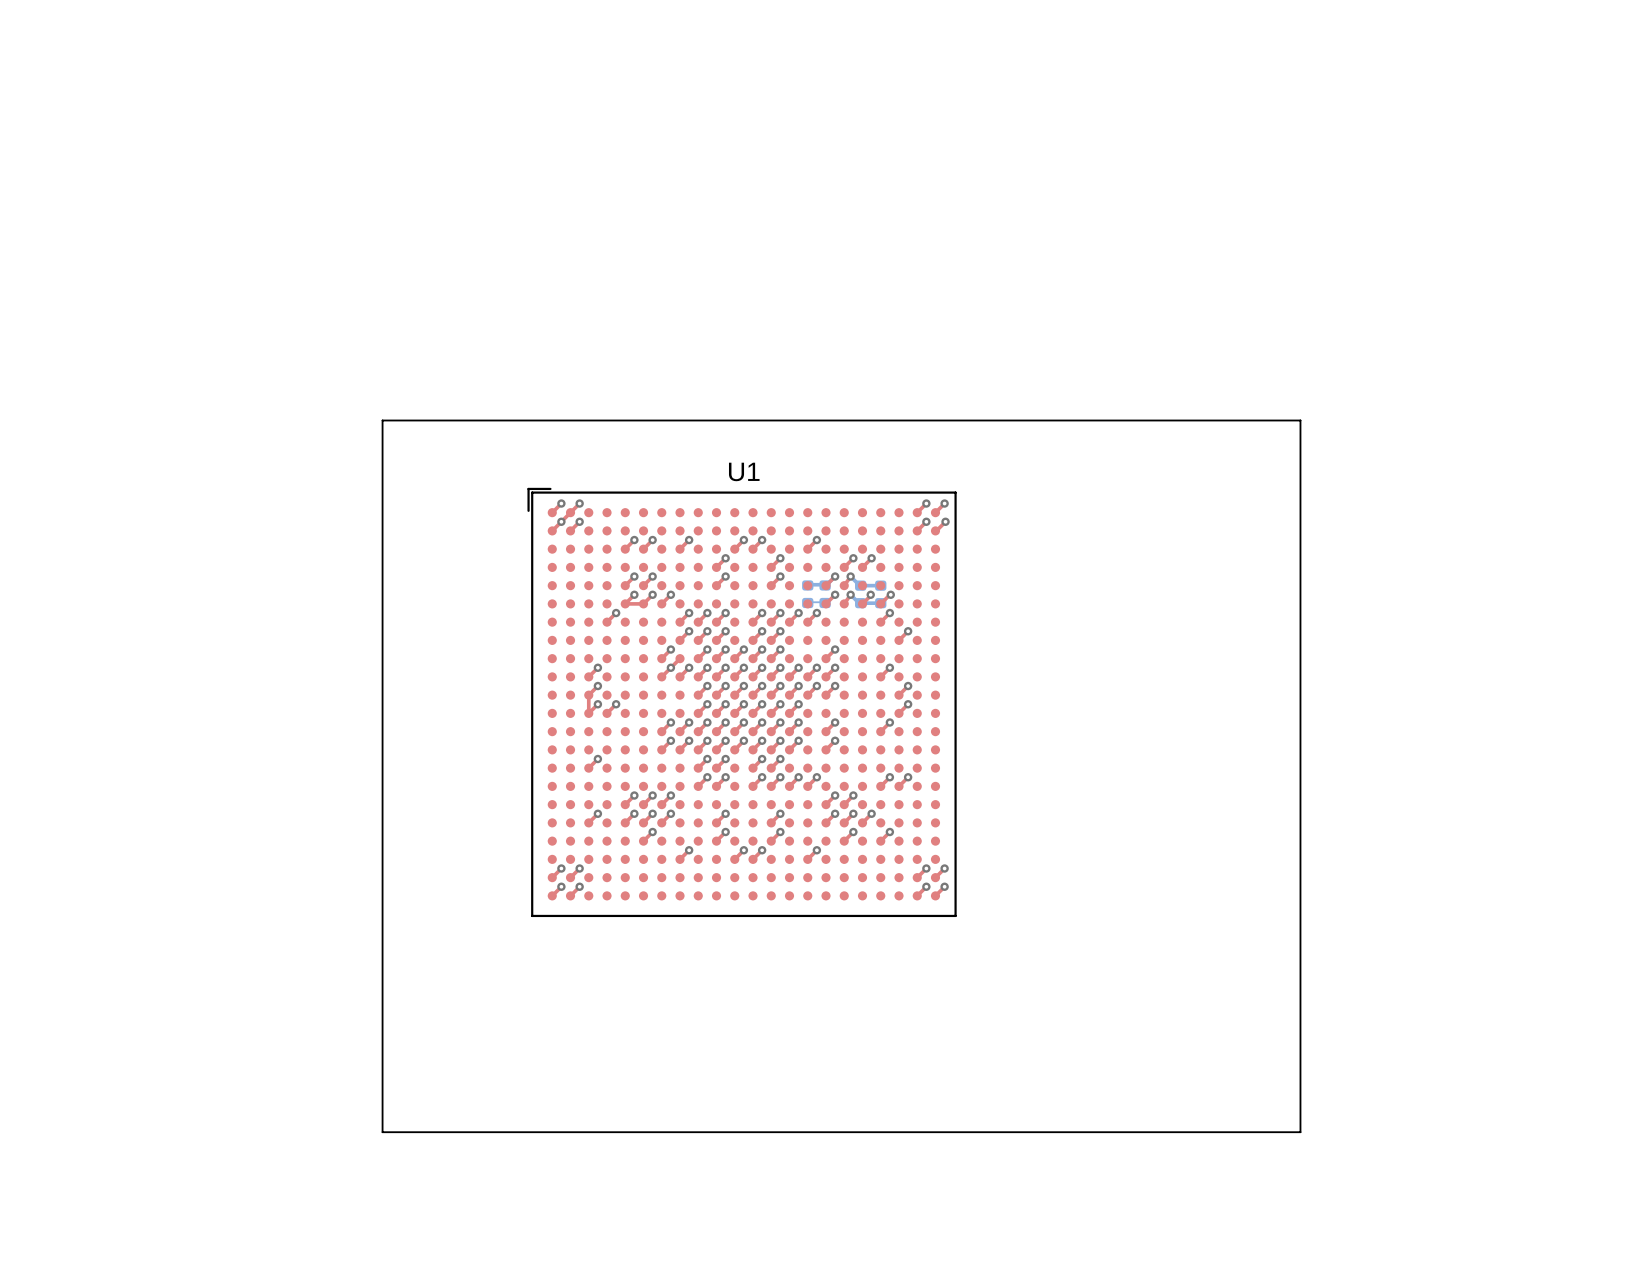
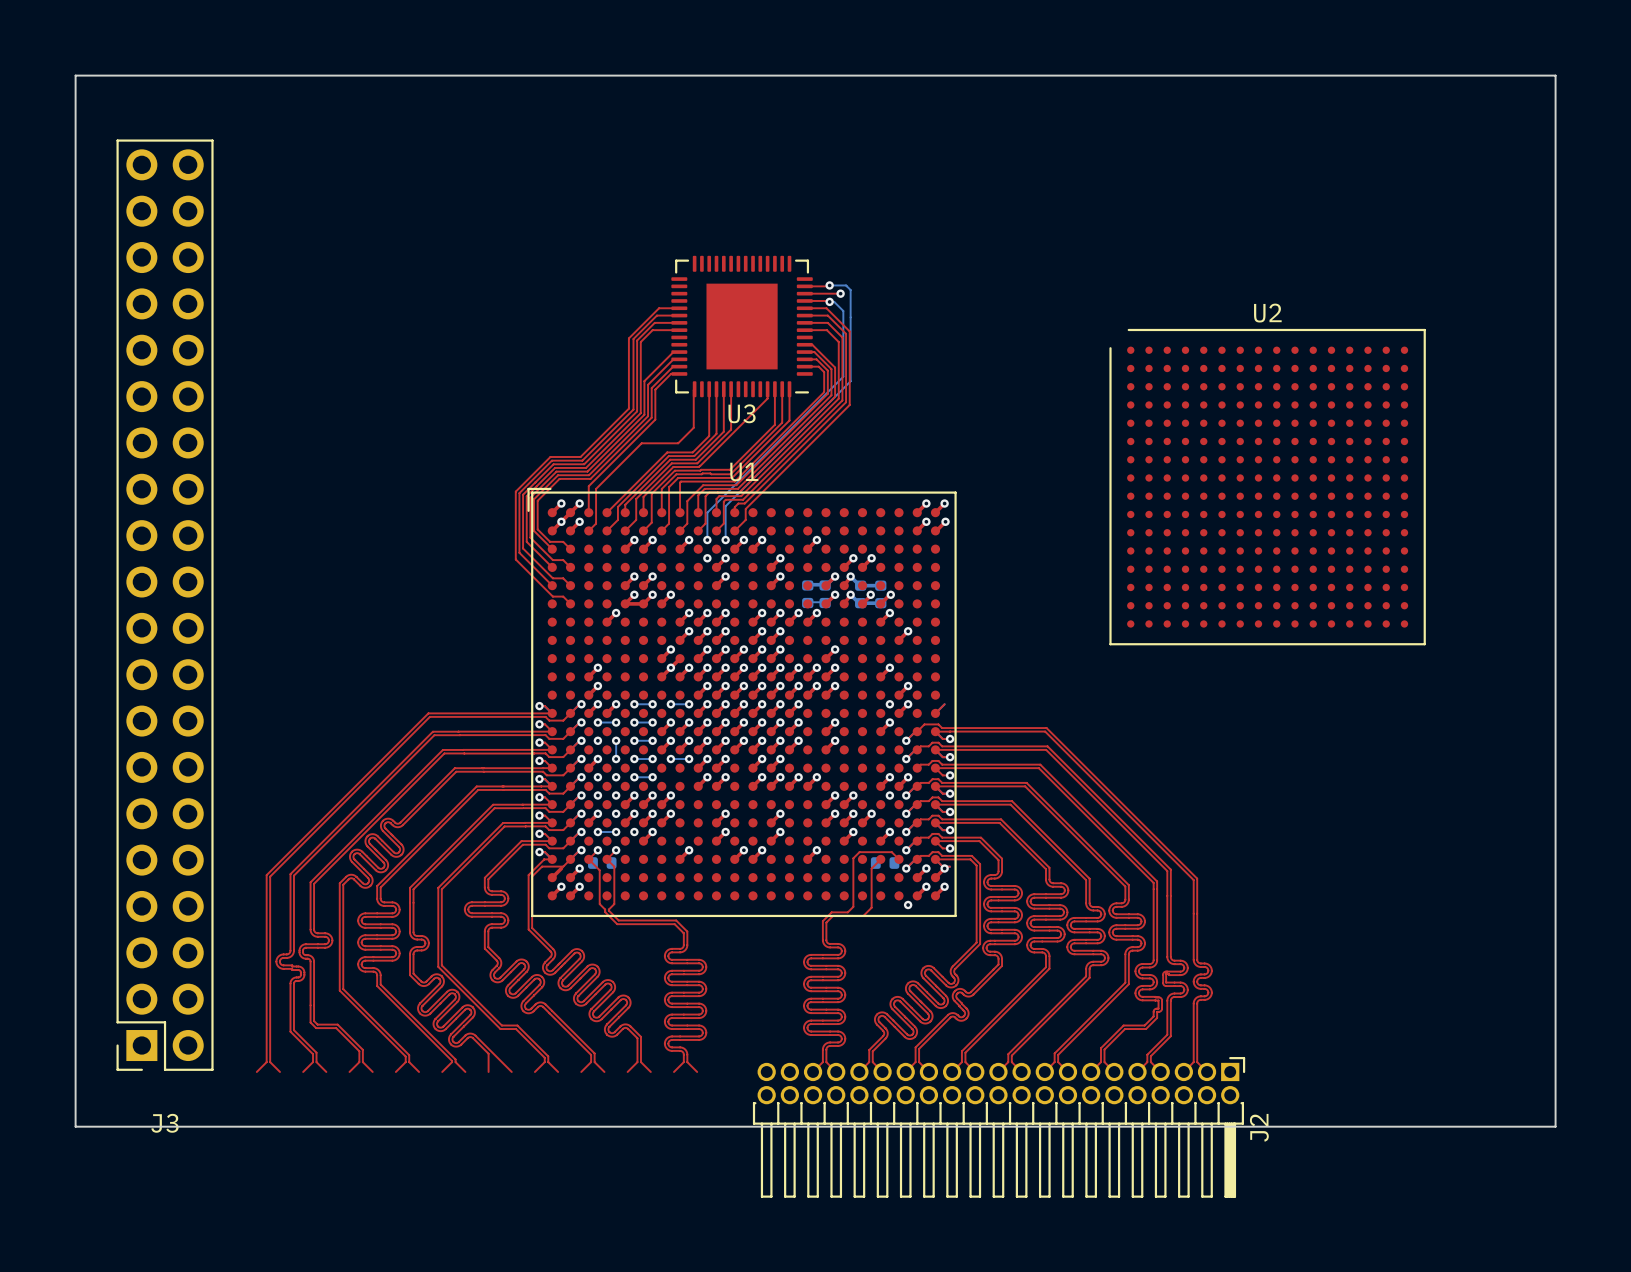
board edge: none -> (75, 75) (1555, 75) (1555, 1126) (75, 1126) (75, 75)
top track: none -> (829, 285) (804, 286)
bottom track: none -> (829, 285) (846, 285) (850, 290) (850, 381) (725, 506) (725, 540)
via: none -> (829, 285)
top track: none -> (804, 293) (840, 293)
via: none -> (840, 293)
top track: none -> (804, 300) (829, 301)
bottom track: none -> (829, 301) (834, 301) (843, 311) (843, 376) (707, 512) (707, 540)
via: none -> (829, 301)
top track: none -> (679, 308) (659, 308) (628, 338) (628, 408) (580, 456) (550, 456) (515, 491) (515, 559) (552, 596) (563, 596) (570, 603)
top track: none -> (804, 308) (826, 308) (849, 331) (849, 404) (745, 509) (745, 519) (734, 530)
top track: none -> (679, 315) (656, 315) (633, 339) (633, 409) (582, 460) (551, 460) (519, 493) (519, 552) (552, 585)
top track: none -> (804, 315) (827, 315) (846, 333) (846, 402) (744, 503) (738, 503) (734, 507) (734, 512)
top track: none -> (679, 322) (654, 322) (637, 340) (637, 411) (584, 464) (553, 464) (523, 494) (523, 548) (552, 578) (563, 578) (570, 585)
top track: none -> (804, 322) (827, 322) (842, 337) (842, 400) (743, 499) (725, 499) (723, 501) (723, 523) (716, 530)
U3: none -> (742, 326)
top track: none -> (679, 330) (652, 330) (640, 342) (640, 413) (586, 467) (555, 467) (526, 496) (526, 541) (552, 567)
top track: none -> (804, 330) (826, 330) (838, 342) (838, 398) (741, 496) (719, 496) (716, 498) (716, 512)
top track: none -> (804, 344) (812, 344) (835, 367) (835, 396) (739, 492) (709, 492) (705, 496) (705, 523) (698, 530)
top track: none -> (679, 352) (673, 352) (644, 381) (644, 414) (587, 471) (556, 471) (530, 497) (530, 537) (552, 560) (563, 560) (570, 567)
top track: none -> (804, 352) (814, 352) (831, 369) (831, 395) (737, 488) (704, 488) (698, 495) (698, 512)
top track: none -> (679, 359) (673, 359) (648, 384) (648, 416) (589, 475) (558, 475) (534, 499) (534, 530) (552, 549)
top track: none -> (804, 359) (816, 359) (827, 370) (827, 393) (736, 485) (703, 485) (687, 501) (687, 523) (680, 530)
top track: none -> (679, 366) (673, 366) (651, 388) (651, 417) (590, 478) (559, 478) (537, 500) (537, 529) (550, 541) (563, 541) (570, 549)
top track: none -> (804, 366) (818, 366) (824, 372) (824, 392) (734, 481) (680, 481) (680, 512)
top track: none -> (679, 373) (671, 373) (655, 389) (655, 419) (588, 486) (588, 512)
top track: none -> (709, 389) (709, 436) (692, 452) (667, 452) (607, 512)
top track: none -> (716, 389) (716, 433) (694, 456) (668, 456) (617, 506) (617, 519) (607, 530)
top track: none -> (723, 389) (723, 431) (695, 459) (670, 459) (625, 504) (625, 512)
top track: none -> (731, 389) (731, 429) (697, 463) (671, 463) (636, 498) (636, 519) (625, 530)
top track: none -> (767, 389) (767, 398) (700, 466) (673, 467) (643, 496) (643, 512)
top track: none -> (774, 389) (774, 424) (729, 469) (674, 470) (651, 493) (651, 522) (643, 530)
top track: none -> (782, 389) (782, 422) (730, 474) (676, 474) (661, 488) (661, 512)
top track: none -> (789, 389) (789, 420) (732, 477) (678, 477) (669, 487) (669, 523) (661, 530)
top track: none -> (694, 390) (693, 427) (678, 443) (641, 443) (596, 488) (596, 523) (588, 530)
board edge: (382, 420) (1300, 420) (1300, 1132) (382, 1132) (382, 420) -> none
U2: none -> (1267, 487)
via: none -> (707, 540)
via: none -> (725, 540)
via: none -> (707, 558)
J3: none -> (165, 605)
top track: (588, 695) (588, 713) -> none
top track: none -> (579, 704) (563, 720) (549, 720) (545, 716) (429, 716) (270, 876) (270, 1062) (280, 1071)
via: none -> (581, 704)
bottom track: none -> (634, 704) (652, 704)
via: none -> (634, 704)
via: none -> (652, 704)
bottom track: none -> (670, 704) (689, 704)
via: none -> (670, 704)
via: none -> (689, 704)
via: none -> (889, 704)
top track: none -> (944, 704) (935, 713)
top track: none -> (539, 706) (544, 706) (552, 713) (428, 713) (266, 875) (266, 1062) (256, 1071)
via: none -> (539, 706)
top track: none -> (579, 722) (563, 738) (549, 738) (545, 735) (460, 735)
via: none -> (581, 722)
bottom track: none -> (597, 722) (616, 722)
via: none -> (597, 722)
via: none -> (616, 722)
bottom track: none -> (634, 722) (652, 722)
via: none -> (634, 722)
via: none -> (652, 722)
top track: none -> (539, 724) (544, 724) (552, 731)
via: none -> (539, 724)
top track: none -> (551, 731) (432, 731) (290, 874) (290, 951) (288, 954) (279, 956) (276, 962) (281, 968) (292, 968) (300, 971) (300, 976) (293, 978) (290, 982) (290, 1031) (313, 1054) (313, 1062) (303, 1071)
top track: none -> (459, 735) (434, 735) (293, 875) (293, 951) (291, 956) (281, 958) (279, 962) (282, 965) (299, 966) (303, 969) (303, 978) (294, 983) (293, 1030) (316, 1052) (316, 1062) (326, 1071)
top track: none -> (950, 738) (942, 738) (935, 731) (1045, 731) (1193, 880) (1193, 960) (1197, 965) (1206, 967) (1208, 970) (1206, 974) (1196, 976) (1193, 982) (1197, 987) (1206, 989) (1208, 992) (1206, 995) (1197, 997) (1194, 1001) (1193, 1062) (1183, 1071)
via: none -> (950, 738)
top track: none -> (581, 740) (563, 757) (549, 757) (545, 753) (534, 753)
via: none -> (581, 740)
via: none -> (597, 740)
bottom track: none -> (616, 740) (616, 759)
via: none -> (616, 740)
bottom track: none -> (634, 740) (652, 740)
via: none -> (634, 740)
via: none -> (652, 740)
top track: none -> (906, 740) (924, 724) (938, 724) (942, 728) (1046, 728) (1197, 878) (1197, 960) (1199, 963) (1209, 965) (1211, 970) (1209, 976) (1199, 978) (1197, 981) (1199, 985) (1208, 986) (1211, 991) (1209, 998) (1199, 1000) (1197, 1003) (1197, 1062) (1207, 1071)
via: none -> (906, 740)
top track: none -> (539, 742) (544, 742) (552, 749) (442, 749) (310, 882) (310, 931) (314, 936) (326, 936) (328, 940) (325, 944) (303, 944) (299, 949) (301, 956) (310, 961) (310, 1022) (316, 1028) (336, 1028) (359, 1051) (359, 1062) (349, 1071)
via: none -> (539, 742)
top track: none -> (915, 749) (906, 759)
top track: none -> (917, 749) (920, 746) (928, 746) (932, 742) (938, 742) (942, 746) (1047, 746) (1170, 869) (1170, 957) (1173, 960) (1184, 961) (1187, 967) (1186, 972) (1182, 974) (1166, 974) (1166, 982) (1182, 982) (1187, 989) (1183, 996) (1171, 998) (1170, 1036) (1150, 1056) (1150, 1062) (1160, 1071)
top track: none -> (534, 753) (444, 753) (314, 883) (314, 930) (316, 933) (328, 934) (332, 940) (327, 947) (305, 947) (303, 949) (303, 954) (311, 956) (314, 960) (314, 1021) (317, 1024) (337, 1024) (362, 1049) (362, 1062) (372, 1071)
top track: none -> (950, 757) (942, 757) (935, 749) (1046, 749) (1167, 871) (1167, 958) (1170, 963) (1181, 964) (1184, 967) (1181, 971) (1164, 972) (1163, 983) (1165, 986) (1181, 986) (1184, 990) (1181, 993) (1172, 993) (1168, 996) (1167, 1034) (1147, 1054) (1147, 1062) (1137, 1071)
via: none -> (950, 757)
top track: none -> (579, 759) (563, 775) (546, 775) (543, 771) (456, 771) (402, 825) (395, 826) (388, 822) (384, 823) (385, 828) (402, 846) (403, 851) (400, 855) (392, 855) (374, 838) (369, 839) (369, 843) (387, 862) (385, 870) (377, 871) (359, 853) (353, 855) (354, 859) (371, 876) (372, 881) (369, 886) (364, 887) (350, 878) (343, 884) (343, 989) (409, 1055) (409, 1062) (419, 1071)
via: none -> (581, 759)
via: none -> (616, 759)
bottom track: none -> (634, 759) (652, 759)
via: none -> (634, 759)
via: none -> (652, 759)
bottom track: none -> (670, 759) (689, 759)
via: none -> (670, 759)
via: none -> (689, 759)
via: none -> (906, 759)
top track: none -> (539, 760) (544, 760) (552, 768) (454, 768) (400, 822) (396, 823) (388, 818) (381, 822) (381, 829) (399, 847) (398, 852) (394, 852) (375, 834) (366, 836) (366, 844) (383, 862) (383, 868) (378, 868) (359, 850) (354, 850) (350, 854) (351, 861) (369, 881) (364, 884) (355, 876) (350, 874) (339, 883) (339, 990) (405, 1056) (405, 1062) (395, 1071)
via: none -> (539, 760)
top track: none -> (917, 768) (920, 764) (928, 764) (932, 760) (938, 760) (942, 764) (1040, 764) (1157, 881) (1156, 961) (1153, 966) (1141, 967) (1138, 971) (1141, 974) (1153, 976) (1157, 982) (1153, 988) (1141, 989) (1138, 993) (1141, 996) (1160, 997) (1161, 1009) (1157, 1011) (1157, 1017) (1146, 1029) (1125, 1029) (1104, 1049) (1104, 1062) (1114, 1071)
top track: none -> (950, 775) (942, 775) (935, 768) (1038, 768) (1153, 882) (1153, 961) (1150, 963) (1139, 964) (1135, 971) (1138, 977) (1151, 978) (1153, 982) (1150, 985) (1138, 987) (1135, 993) (1140, 999) (1155, 1000)
via: none -> (950, 775)
top track: none -> (579, 777) (563, 793) (549, 793) (545, 789) (478, 789) (380, 887) (381, 900) (396, 903) (399, 908) (397, 914) (393, 916) (364, 916) (361, 919) (364, 924) (394, 924) (399, 931) (398, 936) (394, 938) (362, 939) (361, 942) (363, 945) (394, 946) (398, 948) (399, 953) (398, 957) (394, 960) (363, 960) (362, 966) (378, 970) (380, 984) (455, 1059) (455, 1062) (465, 1071)
via: none -> (581, 777)
via: none -> (597, 777)
via: none -> (616, 777)
bottom track: none -> (634, 777) (652, 777)
via: none -> (634, 777)
via: none -> (652, 777)
top track: none -> (539, 779) (544, 779) (552, 786) (476, 786) (377, 886) (378, 902) (382, 905) (394, 906) (395, 912) (364, 913) (358, 918) (358, 923) (363, 927) (392, 927) (395, 929) (393, 935) (364, 935) (360, 937) (358, 944) (362, 949) (392, 949) (396, 953) (392, 957) (363, 957) (358, 961) (358, 966) (363, 971) (376, 972) (377, 986) (452, 1060) (442, 1071)
via: none -> (539, 779)
top track: none -> (915, 786) (906, 795)
top track: none -> (917, 786) (920, 782) (928, 782) (932, 779) (938, 779) (942, 782) (1026, 782) (1128, 885) (1127, 903) (1124, 906) (1114, 907) (1113, 911) (1116, 914) (1140, 914) (1144, 918) (1144, 923) (1139, 928) (1115, 928) (1112, 933) (1116, 936) (1140, 936) (1144, 940) (1144, 945) (1140, 949) (1129, 952) (1128, 984) (1058, 1054) (1058, 1062) (1067, 1071)
top track: none -> (950, 793) (942, 793) (935, 786) (1025, 786) (1125, 886) (1124, 901) (1111, 905) (1109, 909) (1110, 915) (1115, 917) (1138, 917) (1141, 920) (1138, 925) (1115, 925) (1110, 928) (1109, 934) (1113, 938) (1138, 939) (1141, 942) (1139, 946) (1130, 947) (1125, 951) (1125, 982) (1054, 1053) (1054, 1062) (1044, 1071)
via: none -> (950, 793)
top track: none -> (579, 795) (563, 811) (549, 811) (545, 808) (523, 808)
via: none -> (581, 795)
via: none -> (597, 795)
via: none -> (616, 795)
via: none -> (889, 795)
via: none -> (906, 795)
top track: none -> (539, 797) (544, 797) (552, 804)
via: none -> (539, 797)
top track: none -> (551, 804) (493, 804) (410, 887) (410, 933) (413, 938) (423, 939) (425, 943) (423, 946) (414, 947) (410, 951) (410, 975) (422, 985) (427, 985) (435, 977) (440, 980) (419, 1004) (418, 1011) (422, 1015) (427, 1015) (449, 993) (454, 993) (455, 998) (434, 1019) (434, 1026) (437, 1030) (443, 1030) (465, 1009) (469, 1009) (470, 1014) (450, 1035) (449, 1041) (451, 1045) (457, 1046) (468, 1037) (472, 1037) (488, 1053) (488, 1071)
top track: none -> (915, 804) (906, 813)
top track: none -> (917, 804) (920, 801) (928, 801) (932, 797) (938, 797) (942, 801) (1012, 801) (1089, 878) (1089, 904) (1100, 907) (1104, 911) (1104, 917) (1099, 921) (1074, 921) (1070, 925) (1074, 928) (1100, 929) (1104, 934) (1102, 941) (1098, 943) (1074, 943) (1070, 947) (1074, 950) (1103, 951) (1107, 954) (1107, 961) (1103, 964) (1090, 966) (1089, 977) (1011, 1055) (1011, 1062) (1021, 1071)
top track: none -> (523, 808) (494, 808) (413, 889) (413, 933) (416, 935) (425, 937) (428, 943) (425, 949) (414, 952) (413, 973) (422, 982) (435, 974) (441, 975) (443, 980) (442, 985) (422, 1006) (422, 1010) (427, 1011) (448, 990) (456, 991) (459, 996) (458, 1000) (437, 1021) (437, 1026) (443, 1026) (464, 1006) (471, 1006) (474, 1010) (473, 1016) (453, 1037) (452, 1041) (457, 1042) (466, 1034) (473, 1034) (511, 1071)
top track: none -> (950, 811) (942, 811) (935, 804) (1010, 804) (1086, 880) (1086, 906) (1090, 910) (1099, 910) (1101, 913) (1098, 917) (1073, 917) (1069, 920) (1067, 926) (1071, 931) (1098, 932) (1101, 936) (1098, 939) (1072, 940) (1068, 943) (1067, 947) (1072, 954) (1102, 954) (1104, 959) (1088, 963) (1086, 976) (1008, 1054) (1008, 1062) (998, 1071)
via: none -> (950, 811)
top track: none -> (579, 813) (563, 830) (549, 830) (545, 826) (525, 826)
via: none -> (581, 813)
via: none -> (616, 813)
via: none -> (906, 813)
top track: none -> (539, 815) (544, 815) (552, 822)
via: none -> (539, 815)
top track: none -> (551, 822) (503, 822) (438, 887) (438, 966) (500, 1029) (515, 1029) (544, 1057) (544, 1062) (534, 1071)
top track: none -> (915, 822) (906, 832)
top track: none -> (917, 822) (920, 819) (928, 819) (932, 815) (938, 815) (942, 819) (1001, 819) (1049, 867) (1050, 882) (1063, 883) (1068, 888) (1067, 894) (1063, 897) (1033, 897) (1031, 899) (1033, 905) (1060, 905) (1065, 907) (1067, 913) (1063, 918) (1033, 919) (1030, 923) (1033, 927) (1059, 927) (1063, 931) (1064, 936) (1059, 941) (1033, 941) (1031, 943) (1032, 948) (1043, 949) (1047, 951) (1049, 968) (965, 1052) (965, 1062) (975, 1071)
top track: none -> (525, 826) (504, 826) (441, 889) (441, 965) (501, 1025) (517, 1025) (548, 1056) (548, 1062) (558, 1071)
top track: none -> (950, 830) (942, 830) (935, 822) (999, 822) (1045, 869) (1048, 884) (1062, 887) (1064, 890) (1061, 894) (1033, 894) (1028, 897) (1027, 903) (1031, 907) (1060, 908) (1063, 912) (1060, 916) (1031, 916) (1027, 921) (1028, 927) (1033, 930) (1058, 930) (1060, 935) (1057, 937) (1033, 938) (1028, 940) (1027, 946) (1029, 950) (1045, 954) (1045, 967) (961, 1051) (961, 1062) (952, 1071)
via: none -> (950, 830)
top track: none -> (579, 832) (563, 848) (549, 848) (545, 844) (522, 844) (488, 879) (489, 889) (505, 892) (508, 897) (506, 903) (501, 905) (471, 905) (468, 909) (471, 913) (501, 913) (506, 915) (508, 921) (505, 926) (491, 927) (488, 930) (488, 947) (501, 962) (500, 966) (494, 973) (494, 977) (499, 978) (517, 960) (525, 960) (528, 964) (527, 970) (510, 988) (509, 992) (515, 993) (533, 975) (541, 976) (544, 980) (543, 985) (525, 1003) (525, 1008) (530, 1009) (538, 1002) (544, 1003) (594, 1053) (594, 1062) (604, 1071)
via: none -> (581, 832)
bottom track: none -> (597, 832) (616, 832)
via: none -> (597, 832)
via: none -> (616, 832)
via: none -> (634, 832)
via: none -> (906, 832)
top track: none -> (539, 833) (544, 833) (552, 841) (521, 841) (484, 877) (486, 892) (490, 894) (502, 895) (503, 901) (470, 902) (465, 905) (465, 911) (470, 916) (504, 918) (502, 923) (489, 924) (485, 929) (484, 948) (497, 962) (490, 972) (491, 978) (494, 981) (500, 981) (519, 963) (523, 963) (524, 968) (506, 988) (507, 995) (513, 997) (517, 996) (535, 979) (539, 979) (540, 984) (522, 1002) (521, 1008) (529, 1013) (538, 1006) (542, 1006) (591, 1054) (591, 1062) (581, 1071)
via: none -> (539, 833)
top track: none -> (915, 841) (906, 850)
top track: none -> (917, 841) (920, 837) (928, 837) (932, 833) (938, 833) (942, 837) (981, 837) (1002, 858) (1001, 874) (997, 878) (988, 879) (988, 884) (1016, 886) (1021, 891) (1020, 897) (1017, 900) (990, 900) (988, 902) (990, 907) (1015, 907) (1019, 910) (1021, 916) (1017, 921) (990, 922) (987, 926) (990, 929) (1017, 930) (1020, 933) (1021, 938) (1016, 944) (987, 945) (988, 950) (997, 952) (1000, 955) (1002, 965) (972, 995) (967, 996) (960, 992) (957, 993) (956, 997) (962, 1003)
top track: none -> (950, 848) (942, 848) (935, 841) (979, 841) (998, 860) (998, 872) (986, 877) (984, 881) (985, 886) (990, 889) (1015, 889) (1018, 893) (1015, 896) (990, 896) (984, 901) (984, 906) (988, 910) (1015, 911) (1018, 915) (1015, 918) (988, 919) (984, 924) (986, 931) (990, 933) (1015, 933) (1018, 937) (1015, 940) (989, 940) (984, 943) (984, 951) (987, 954) (997, 956) (998, 964) (970, 992) (960, 988) (954, 991) (953, 998) (959, 1005)
via: none -> (950, 848)
top track: none -> (579, 850) (563, 866) (542, 866) (532, 876) (532, 928) (554, 951) (554, 957) (546, 966) (548, 970) (552, 970) (573, 950) (578, 949) (583, 952) (583, 959) (562, 980) (563, 986) (567, 985) (588, 965) (594, 964) (598, 968) (598, 975) (578, 996) (579, 1001) (583, 1001) (604, 980) (609, 980) (613, 982) (614, 990) (593, 1011) (594, 1016) (598, 1016) (618, 997)
via: none -> (581, 850)
top track: none -> (597, 850) (588, 859) (599, 870) (599, 904) (617, 924) (674, 924) (683, 933)
via: none -> (597, 850)
top track: none -> (616, 850) (607, 859) (614, 866) (614, 904) (608, 910) (618, 920) (676, 920) (687, 931) (687, 946) (682, 951) (670, 952) (669, 958) (700, 959) (705, 964) (705, 970) (701, 973) (671, 974) (668, 977) (671, 981) (699, 981) (705, 986) (705, 992) (701, 995) (671, 996) (668, 999) (671, 1003) (699, 1003) (705, 1008) (705, 1013) (701, 1017) (671, 1018) (668, 1021) (671, 1025) (699, 1025) (705, 1028) (705, 1035) (701, 1039) (671, 1039) (668, 1043) (670, 1047) (685, 1049) (687, 1062) (697, 1071)
via: none -> (616, 850)
via: none -> (906, 850)
top track: none -> (539, 852) (544, 852) (552, 859) (544, 859)
via: none -> (539, 852)
top track: none -> (544, 859) (528, 875) (528, 929) (551, 953) (543, 963) (543, 970) (547, 974) (552, 974) (574, 953) (579, 953) (579, 958) (559, 978) (558, 983) (561, 988) (568, 989) (590, 968) (595, 969) (595, 974) (574, 995) (574, 1002) (579, 1005) (585, 1004) (605, 984) (610, 984) (610, 989) (589, 1011) (589, 1016) (593, 1020) (601, 1019) (621, 999) (626, 1000) (626, 1005) (606, 1025) (604, 1029) (607, 1035) (613, 1036) (626, 1028) (637, 1038) (637, 1062) (627, 1071)
top track: none -> (880, 859) (871, 868) (871, 907) (863, 915) (833, 915) (826, 922) (826, 942) (842, 945) (845, 950) (843, 955) (838, 958) (810, 958) (807, 961) (810, 965) (839, 966) (845, 971) (844, 976) (840, 979) (810, 980) (807, 983) (810, 987) (838, 987) (844, 992) (844, 998) (840, 1001) (810, 1002) (807, 1005) (810, 1009) (838, 1009) (844, 1013) (844, 1019) (840, 1023) (810, 1024) (807, 1027) (810, 1031) (838, 1031) (844, 1034) (845, 1040) (842, 1044) (829, 1046) (826, 1048) (826, 1062) (836, 1071)
top track: none -> (899, 859) (891, 852) (859, 852) (853, 858) (853, 906) (847, 912) (831, 912) (822, 921) (823, 944) (828, 947) (839, 947) (841, 952) (838, 954) (809, 955) (804, 959) (804, 965) (808, 968) (838, 969) (841, 972) (839, 976) (810, 976) (804, 981) (804, 987) (808, 990) (838, 991) (841, 994) (839, 998) (810, 998) (804, 1003) (804, 1009) (808, 1012) (838, 1013) (841, 1016) (839, 1020) (810, 1020) (804, 1024) (804, 1030) (808, 1034) (838, 1035) (841, 1038) (839, 1042) (828, 1042) (824, 1045) (822, 1062) (813, 1071)
top track: none -> (915, 859) (906, 868)
top track: none -> (917, 859) (920, 855) (928, 855) (932, 852) (938, 852) (942, 855) (971, 855) (980, 864) (980, 944) (954, 969) (958, 980) (954, 986) (946, 986) (930, 969) (925, 971) (925, 975) (947, 997) (947, 1002) (944, 1007) (937, 1007) (915, 985) (909, 986) (910, 990) (931, 1012) (932, 1018) (929, 1022) (921, 1022) (899, 1001) (894, 1002) (894, 1006) (916, 1028) (916, 1033) (914, 1037) (906, 1038) (884, 1016) (879, 1017) (878, 1021) (886, 1029) (887, 1034) (872, 1051) (872, 1062) (882, 1071)
part: none -> (602, 863)
part: none -> (885, 863)
top track: none -> (950, 866) (942, 866) (935, 859) (970, 859) (976, 865) (976, 942) (951, 967) (950, 973) (954, 979) (952, 983) (948, 983) (931, 966) (925, 966) (922, 969) (922, 976) (943, 998) (942, 1004) (938, 1003) (916, 982) (911, 981) (906, 984) (906, 992) (928, 1014) (927, 1019) (923, 1019) (901, 997) (895, 997) (891, 999) (891, 1007) (912, 1029) (912, 1034) (907, 1034) (885, 1013) (877, 1014) (875, 1022) (883, 1031) (884, 1034) (869, 1049) (869, 1062) (859, 1071)
via: (561, 868) -> none
via: none -> (906, 868)
via: none -> (908, 905)
top track: none -> (683, 933) (683, 947) (668, 949) (665, 953) (665, 959) (671, 963) (700, 963) (702, 968) (699, 970) (669, 971) (665, 974) (665, 980) (671, 985) (700, 985) (702, 989) (699, 992) (669, 993) (665, 996) (665, 1001) (670, 1006) (699, 1007) (702, 1011) (699, 1014) (669, 1014) (665, 1017) (665, 1023) (670, 1028) (699, 1029) (702, 1033) (699, 1036) (671, 1036) (666, 1039) (664, 1044) (667, 1049) (681, 1051) (683, 1053) (683, 1062) (673, 1071)
top track: none -> (618, 997) (627, 996) (630, 1004) (609, 1027) (608, 1030) (613, 1032) (623, 1024) (630, 1026) (640, 1036) (640, 1062) (650, 1071)
top track: none -> (1155, 1000) (1158, 1000) (1158, 1008) (1154, 1010) (1153, 1016) (1144, 1025) (1123, 1025) (1101, 1048) (1101, 1062) (1091, 1071)
top track: none -> (961, 1003) (968, 1011) (966, 1018) (960, 1020) (951, 1017) (919, 1048) (919, 1062) (928, 1071)
top track: none -> (959, 1006) (964, 1011) (964, 1015) (960, 1017) (952, 1013) (947, 1015) (915, 1047) (915, 1062) (905, 1071)
J2: none -> (999, 1127)

